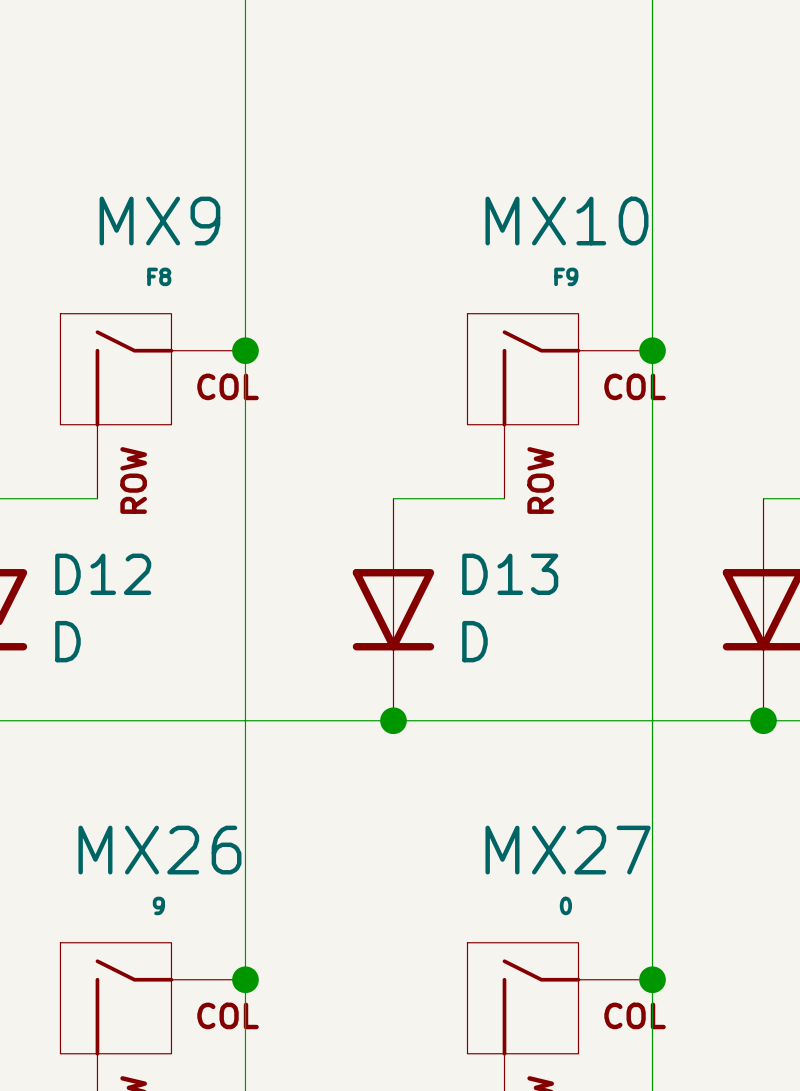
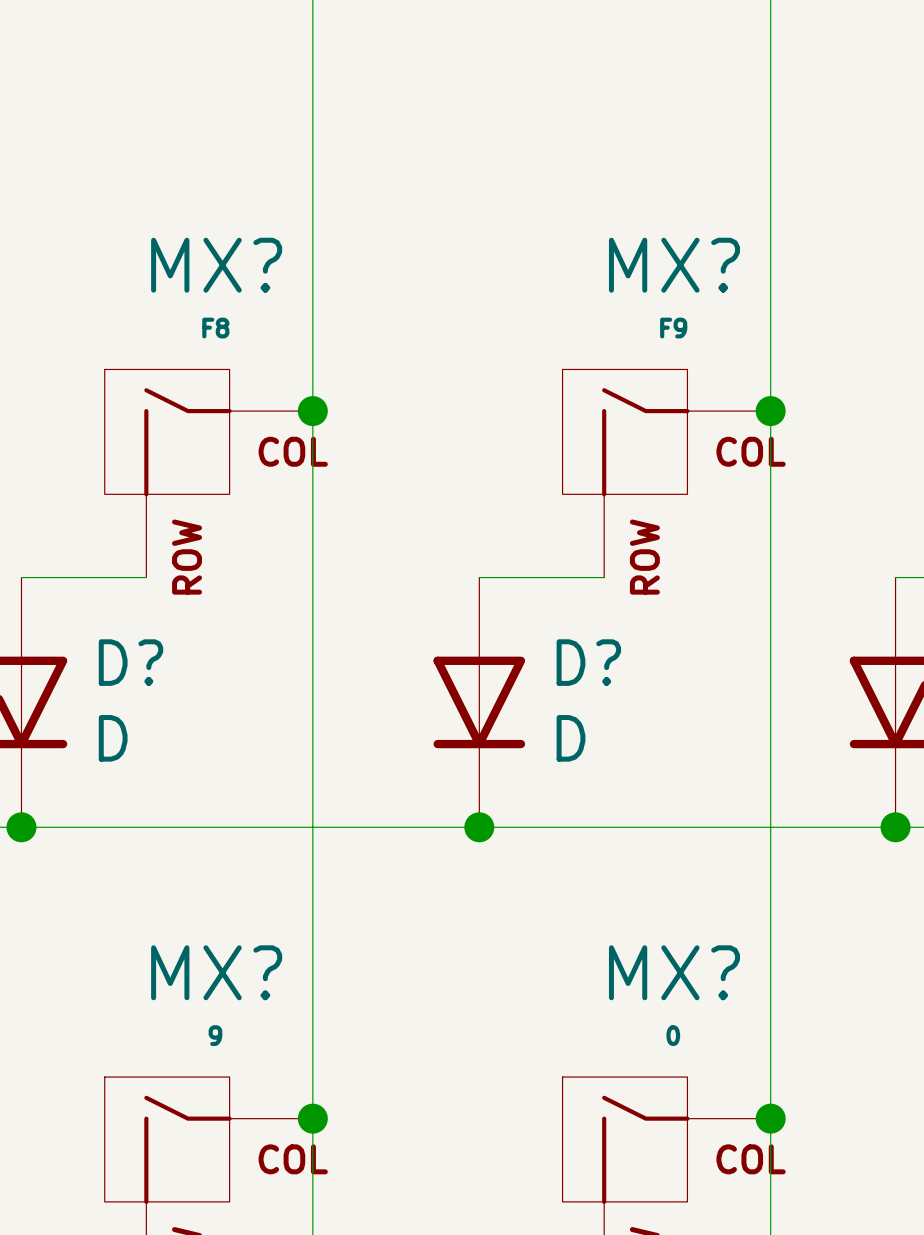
MX9 name: MX9 (159, 221) -> MX? (216, 265)
MX10 name: MX10 (566, 221) -> MX? (674, 265)
D12 name: D12 (103, 574) -> D? (131, 662)
D13 name: D13 (510, 574) -> D? (588, 662)
MX26 name: MX26 (159, 850) -> MX? (216, 972)
MX27 name: MX27 (568, 850) -> MX? (674, 972)

